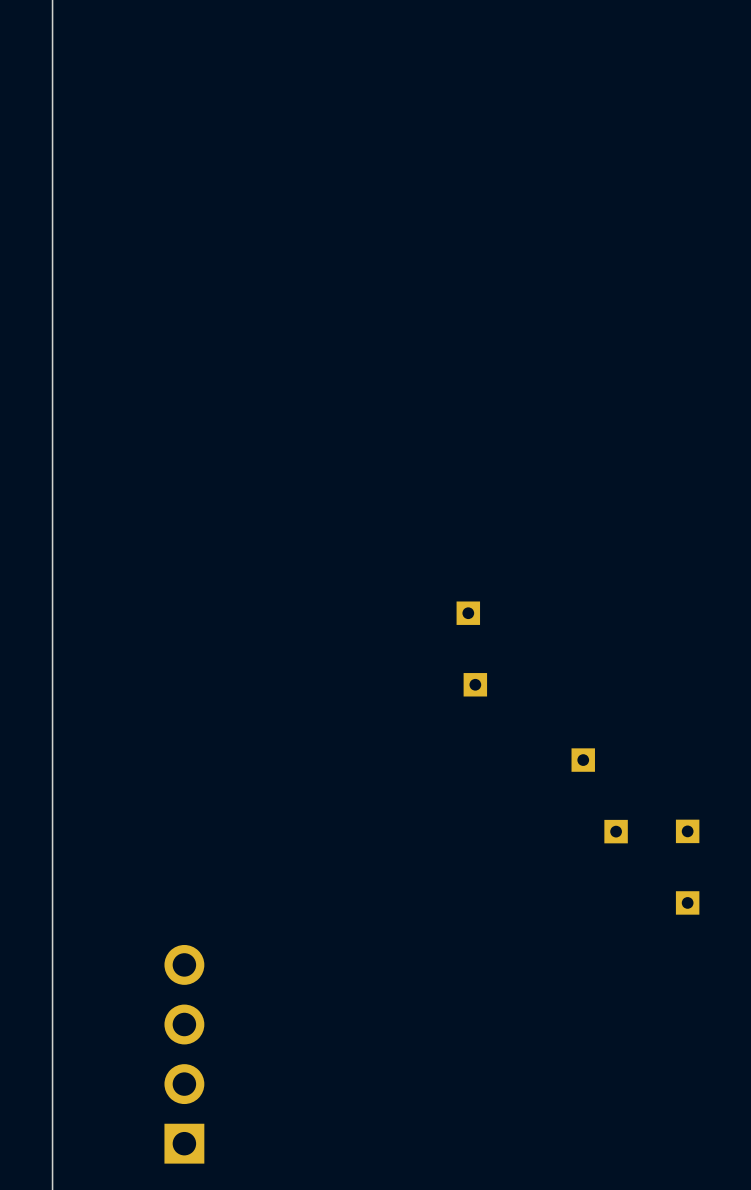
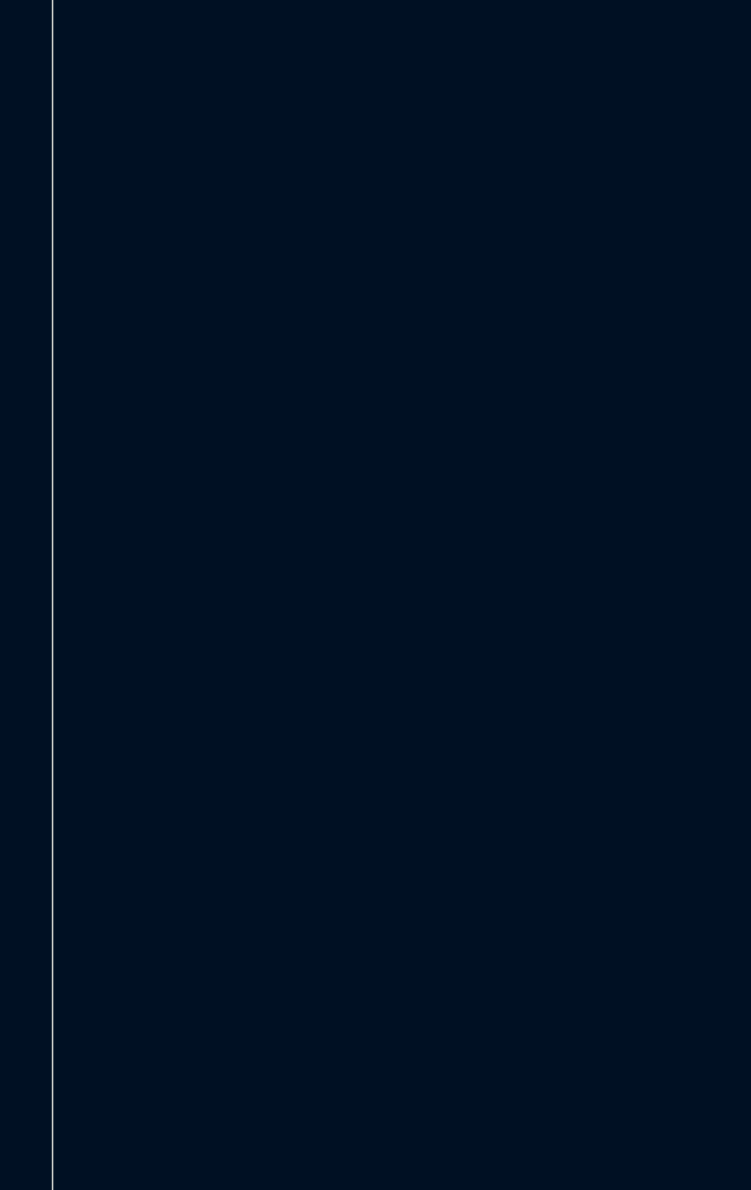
part: (468, 613) -> none
part: (475, 684) -> none
part: (583, 760) -> none
part: (616, 831) -> none
part: (687, 831) -> none
part: (687, 902) -> none
part: (184, 1054) -> none

